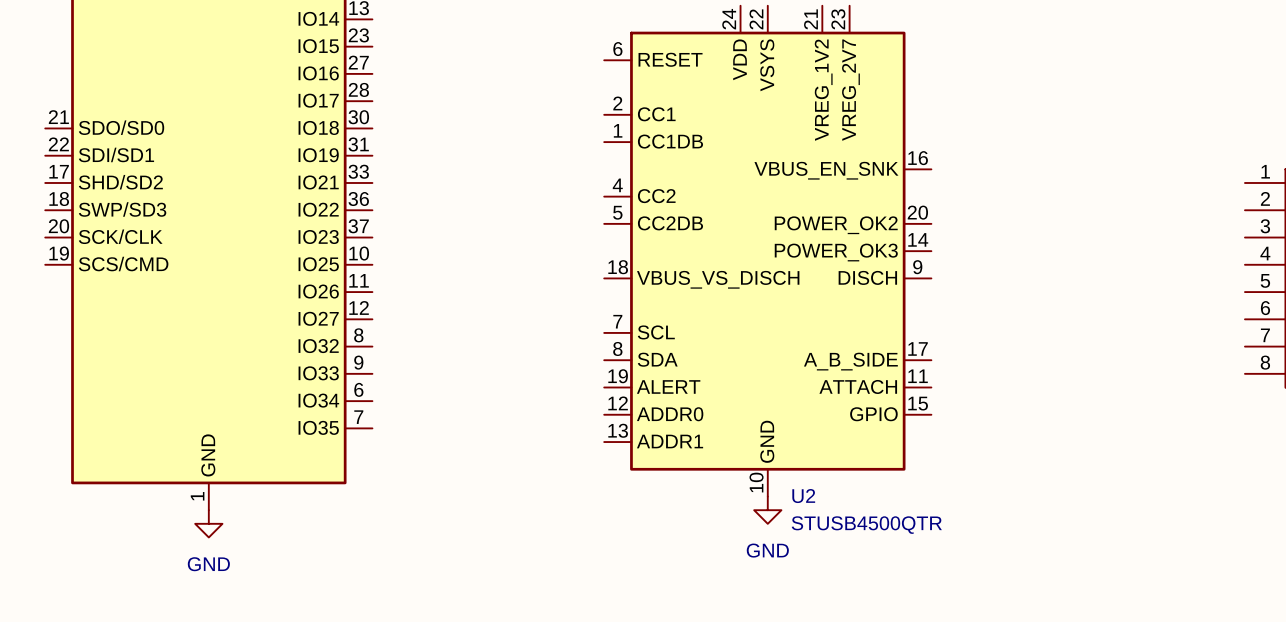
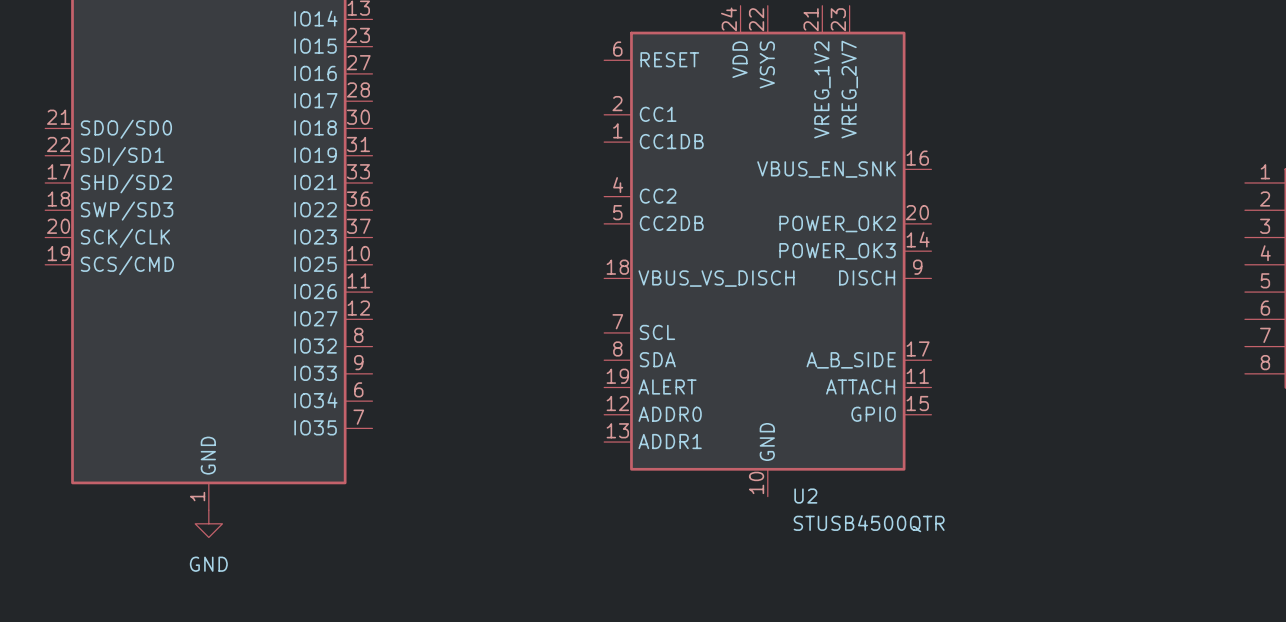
power symbol: GND (767, 510) -> none

